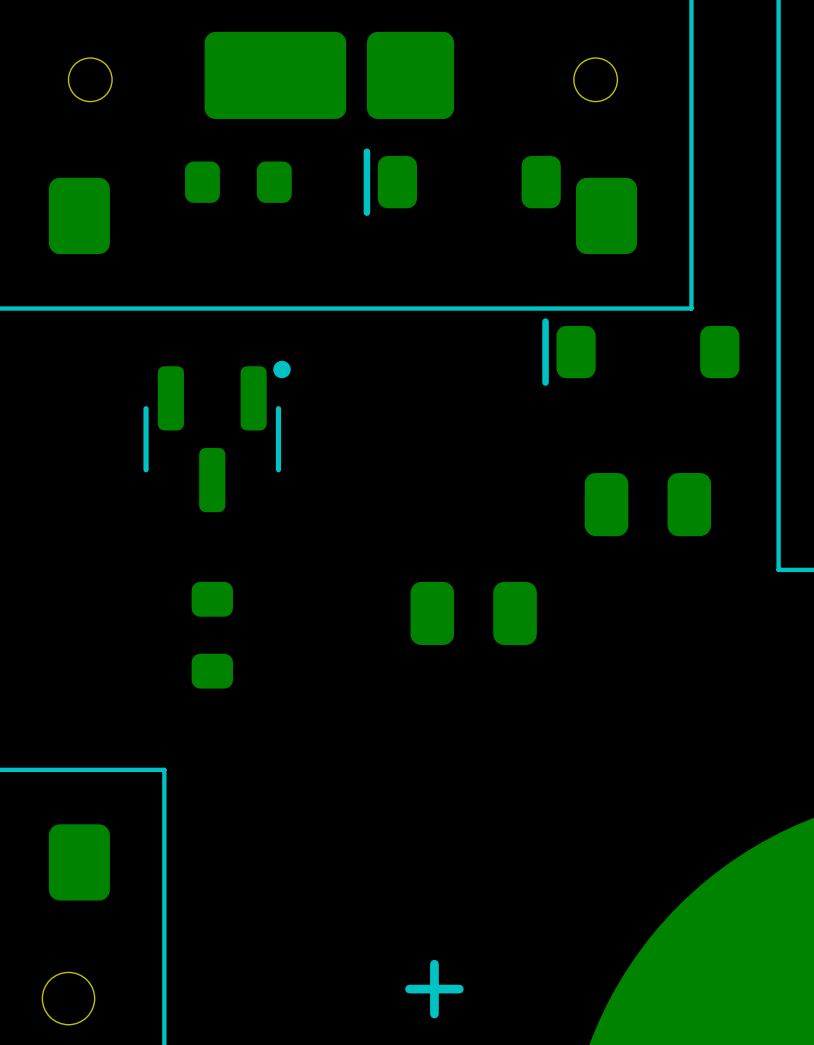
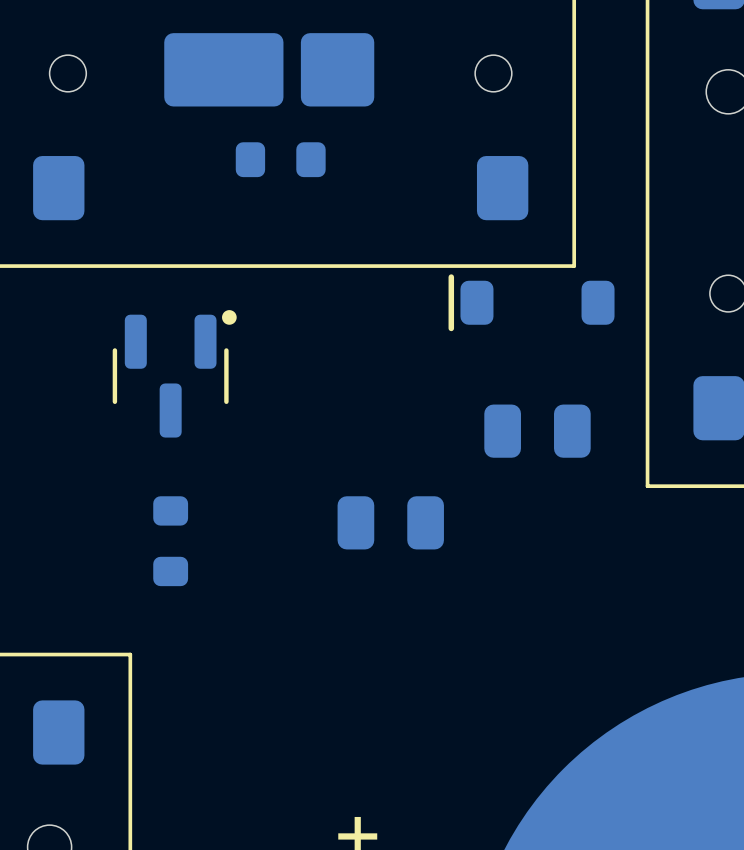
part position: (238, 182) -> (280, 159)
part: (462, 182) -> none

